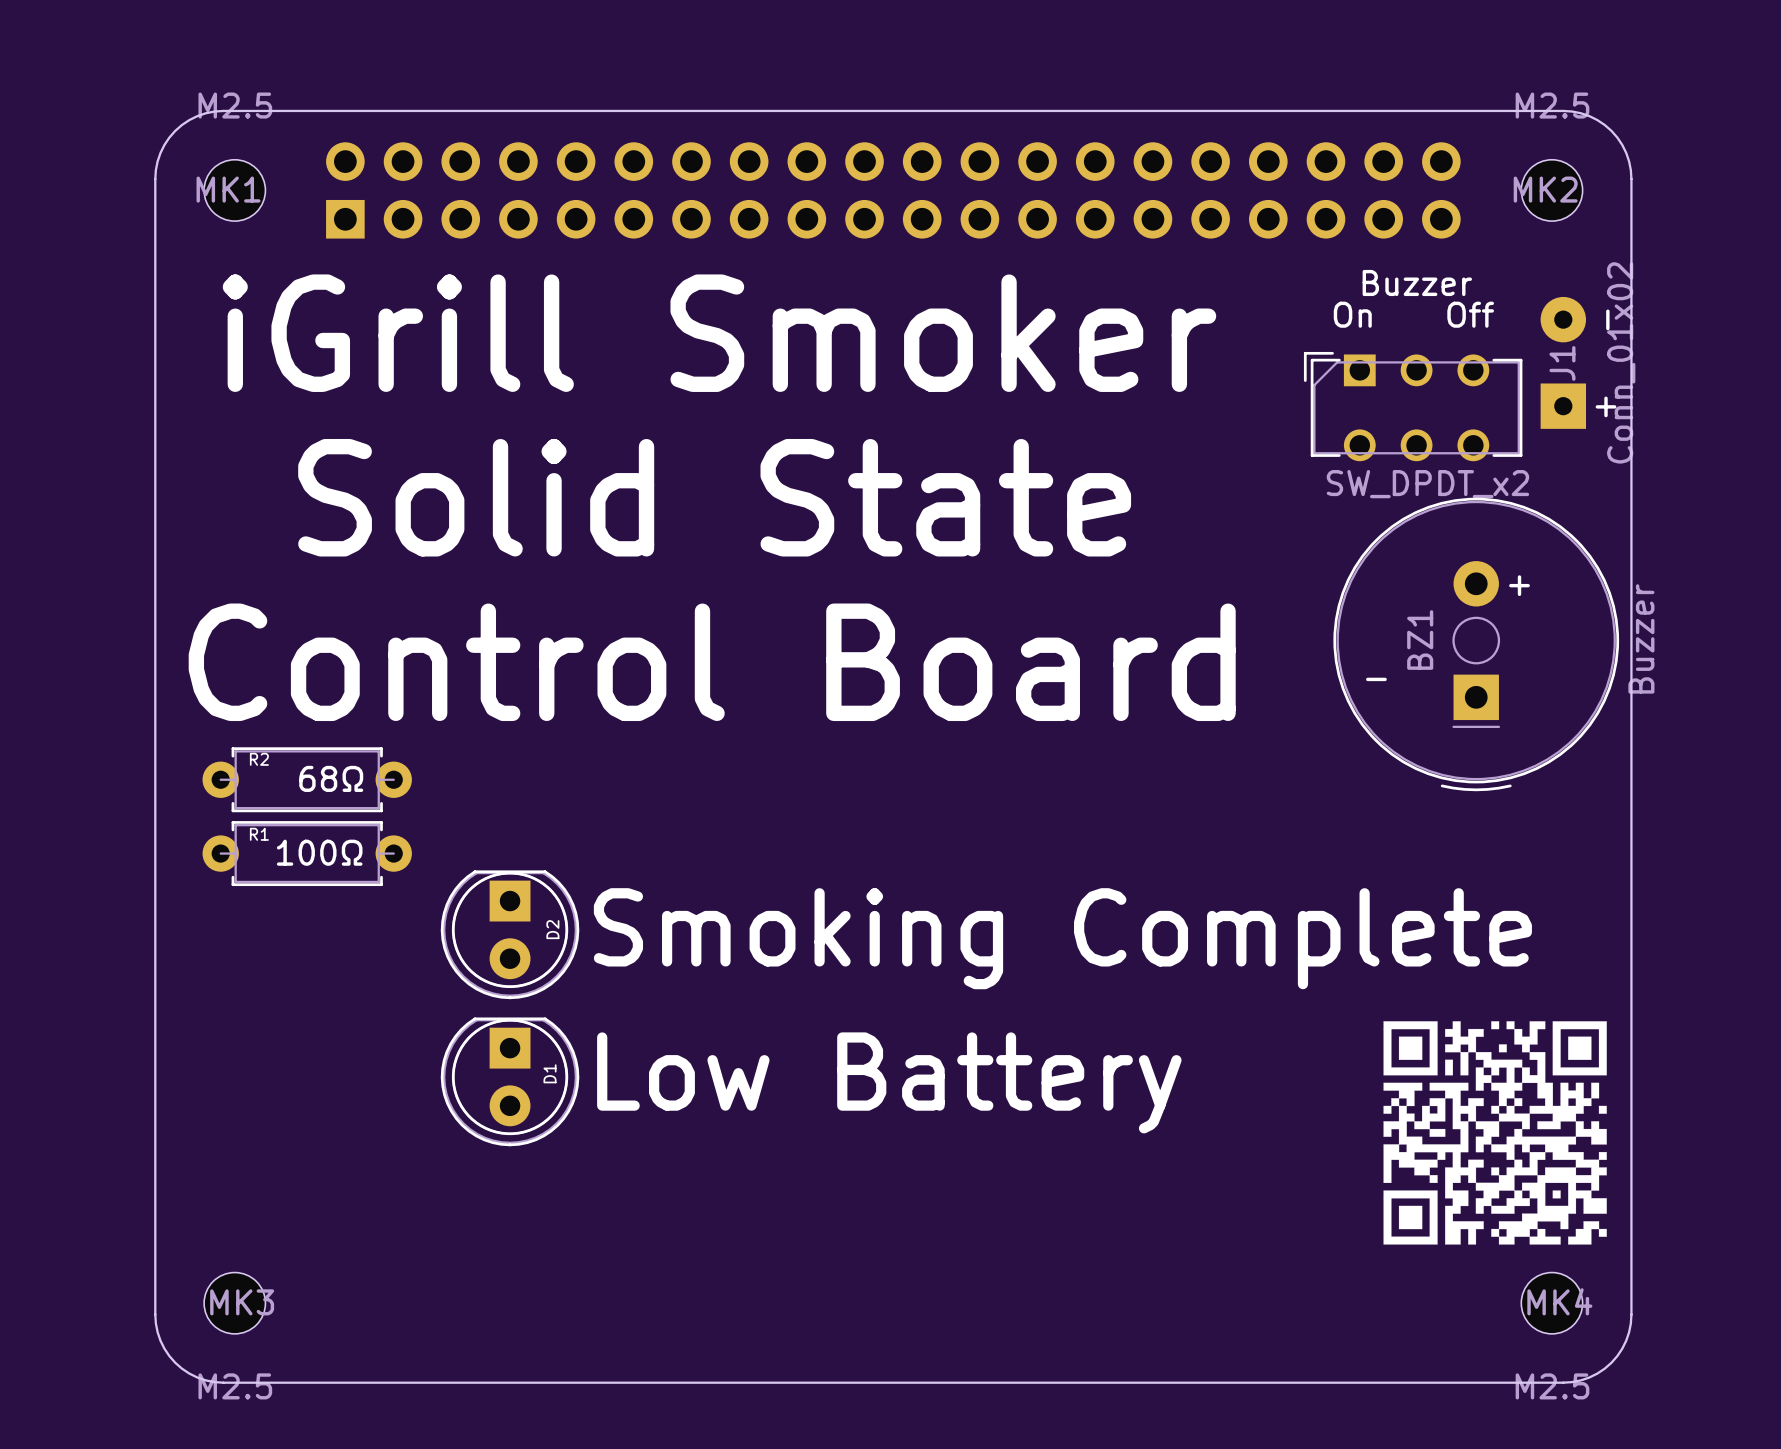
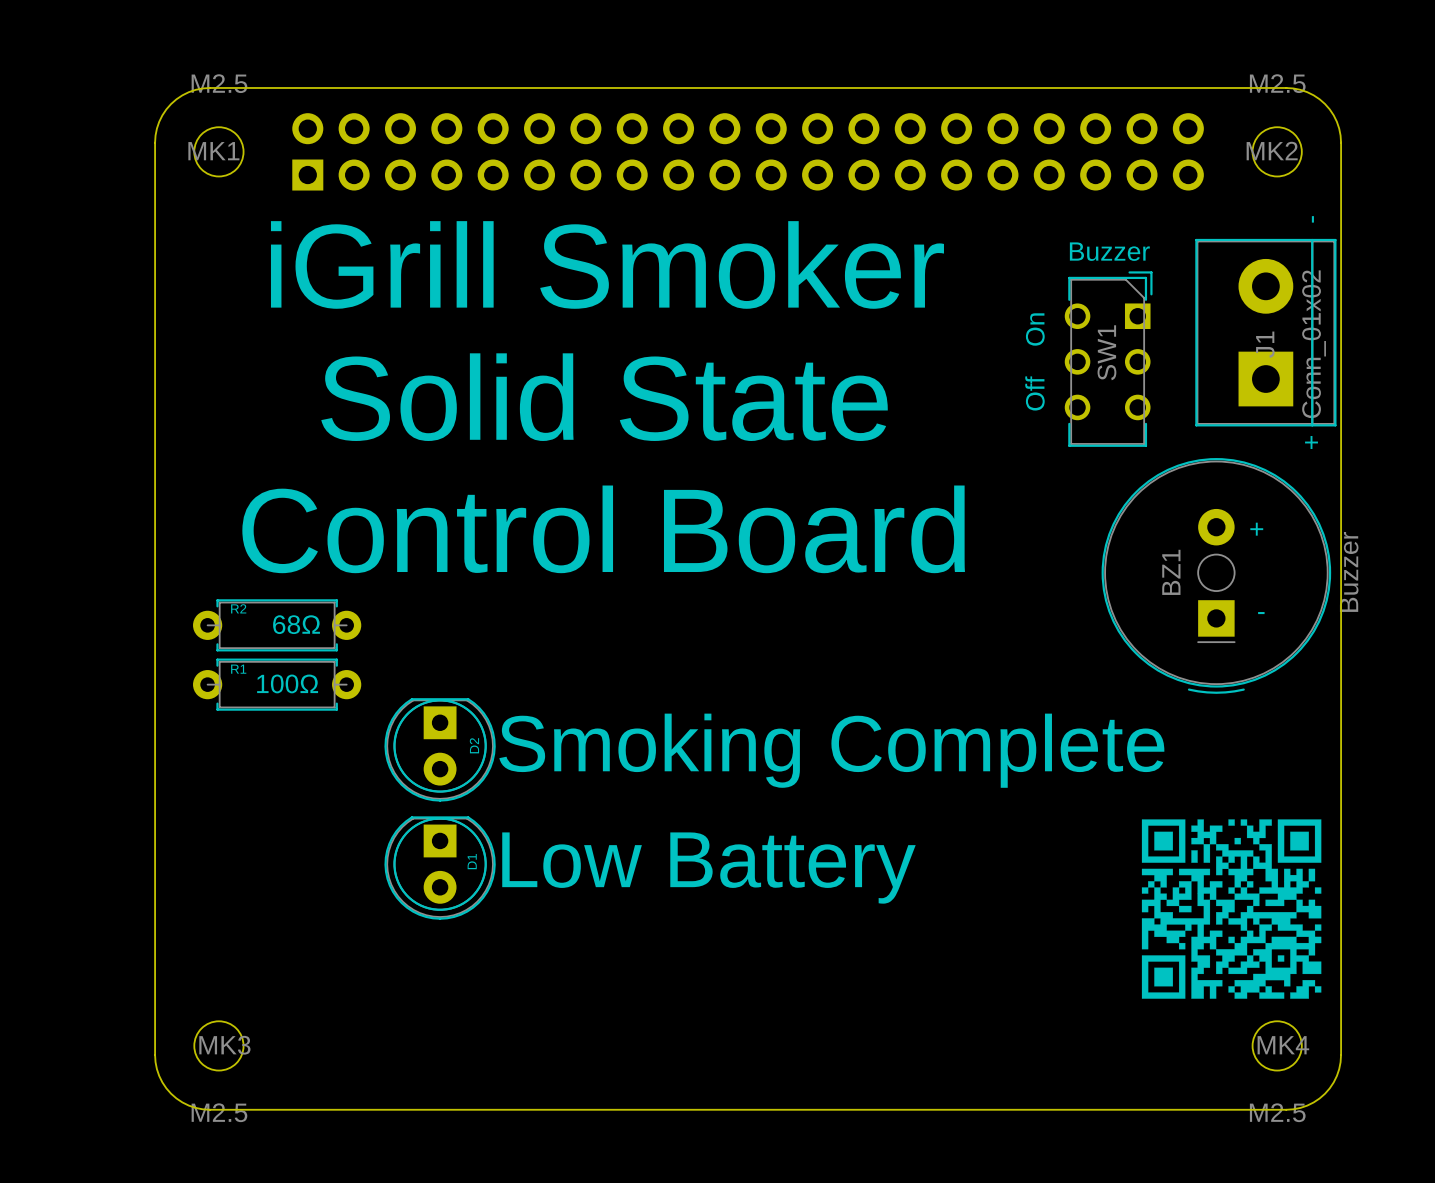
text position: Buzzer (1417, 282) -> Buzzer (1109, 251)
J1 footprint: [1540, 296, 1587, 429] -> [1195, 238, 1337, 427]
text position: - (1607, 319) -> - (1312, 219)
On Off: SW_DPDT_x2 (1413, 406) -> none
text: + (1606, 406) -> none
SW1: none -> Off On (1108, 359)
text: none -> + (1311, 442)
text: + (1519, 585) -> none
BZ1 position: (1476, 644) -> (1216, 575)
text: none -> + (1256, 529)
text position: - (1376, 679) -> - (1261, 613)

